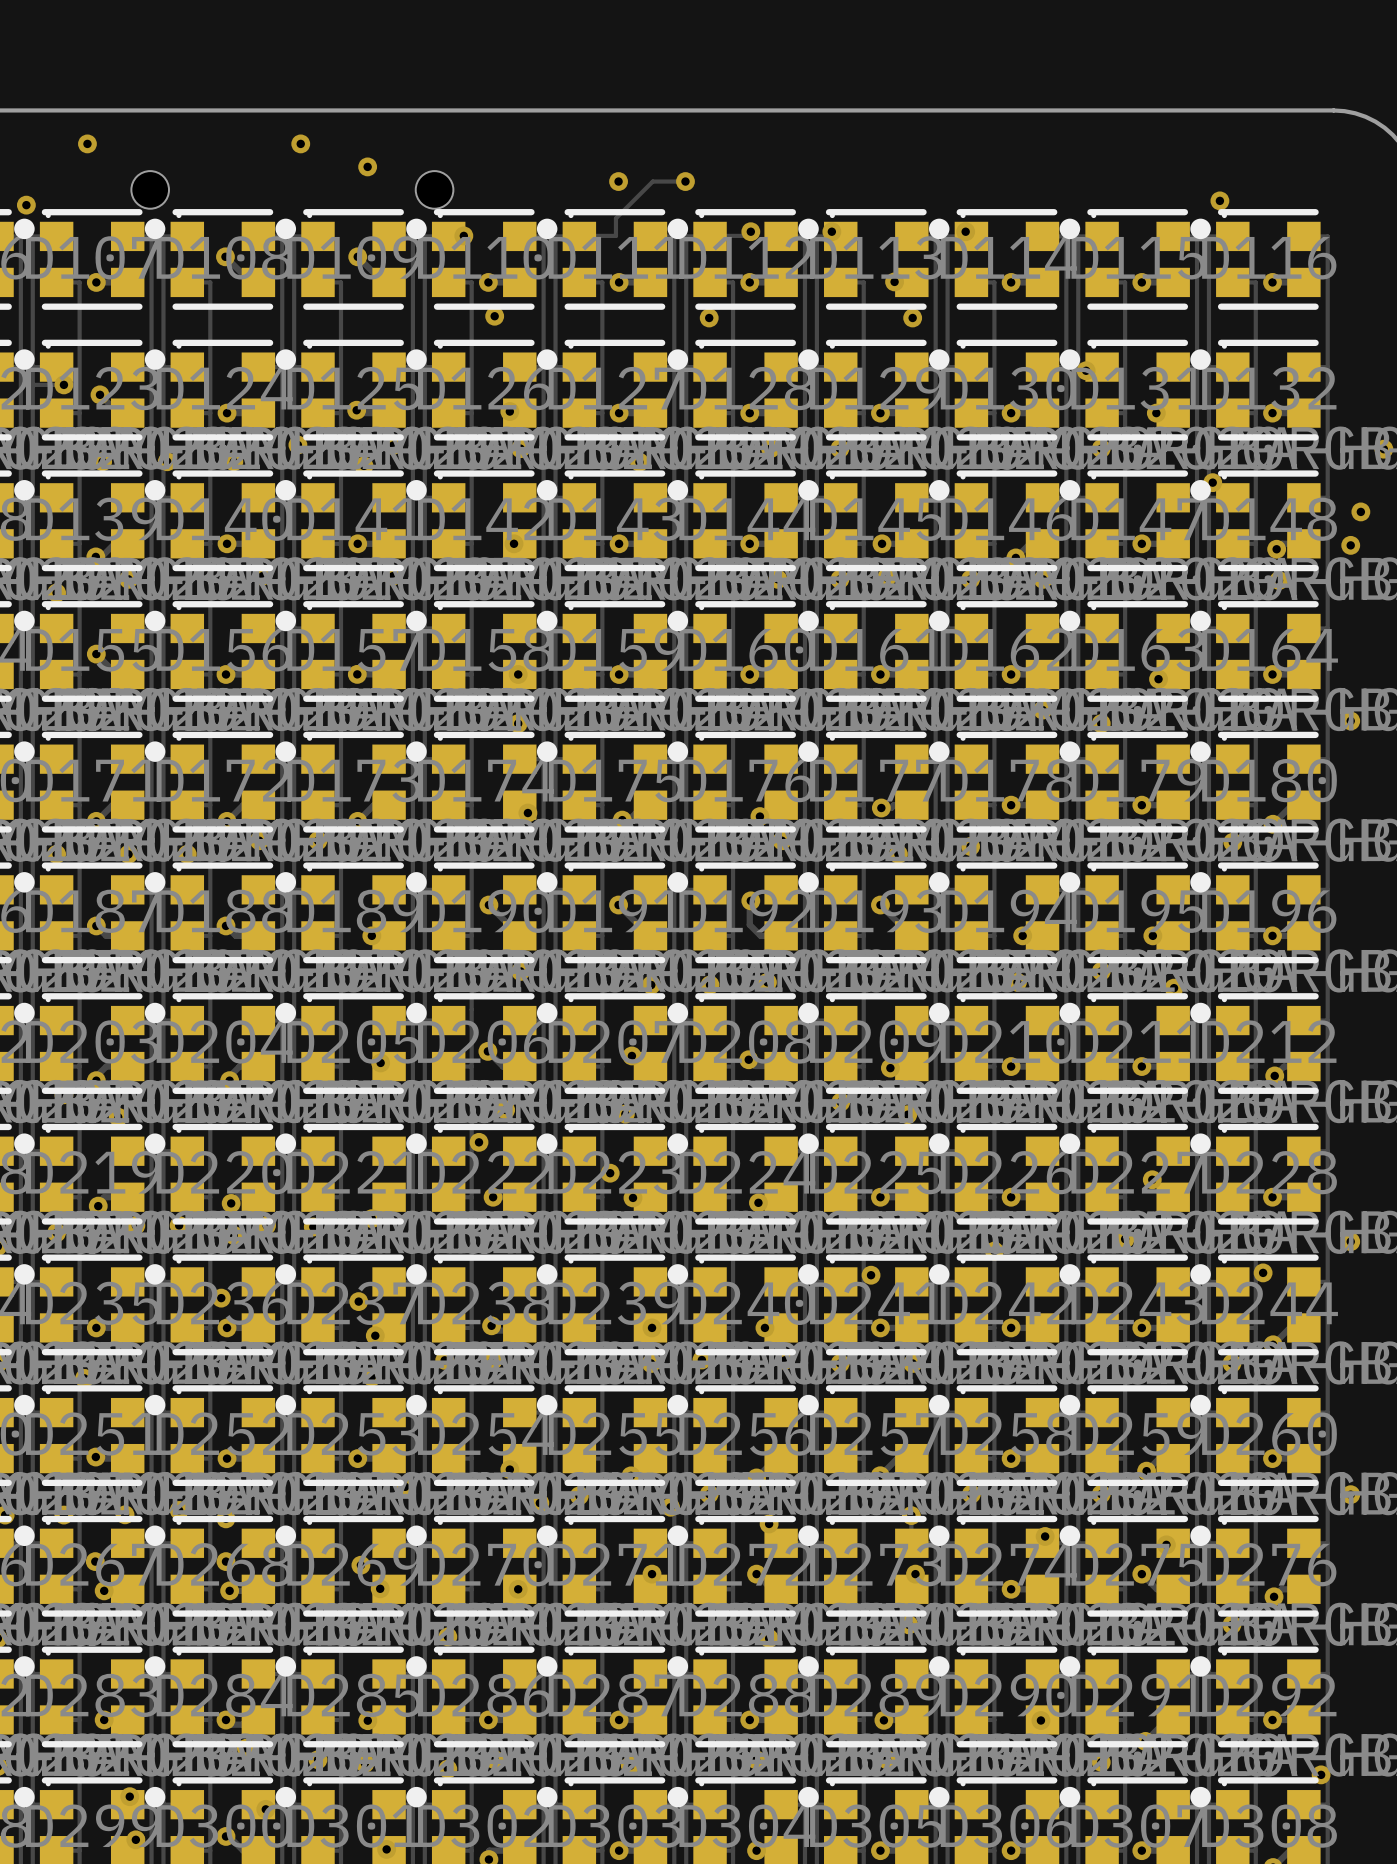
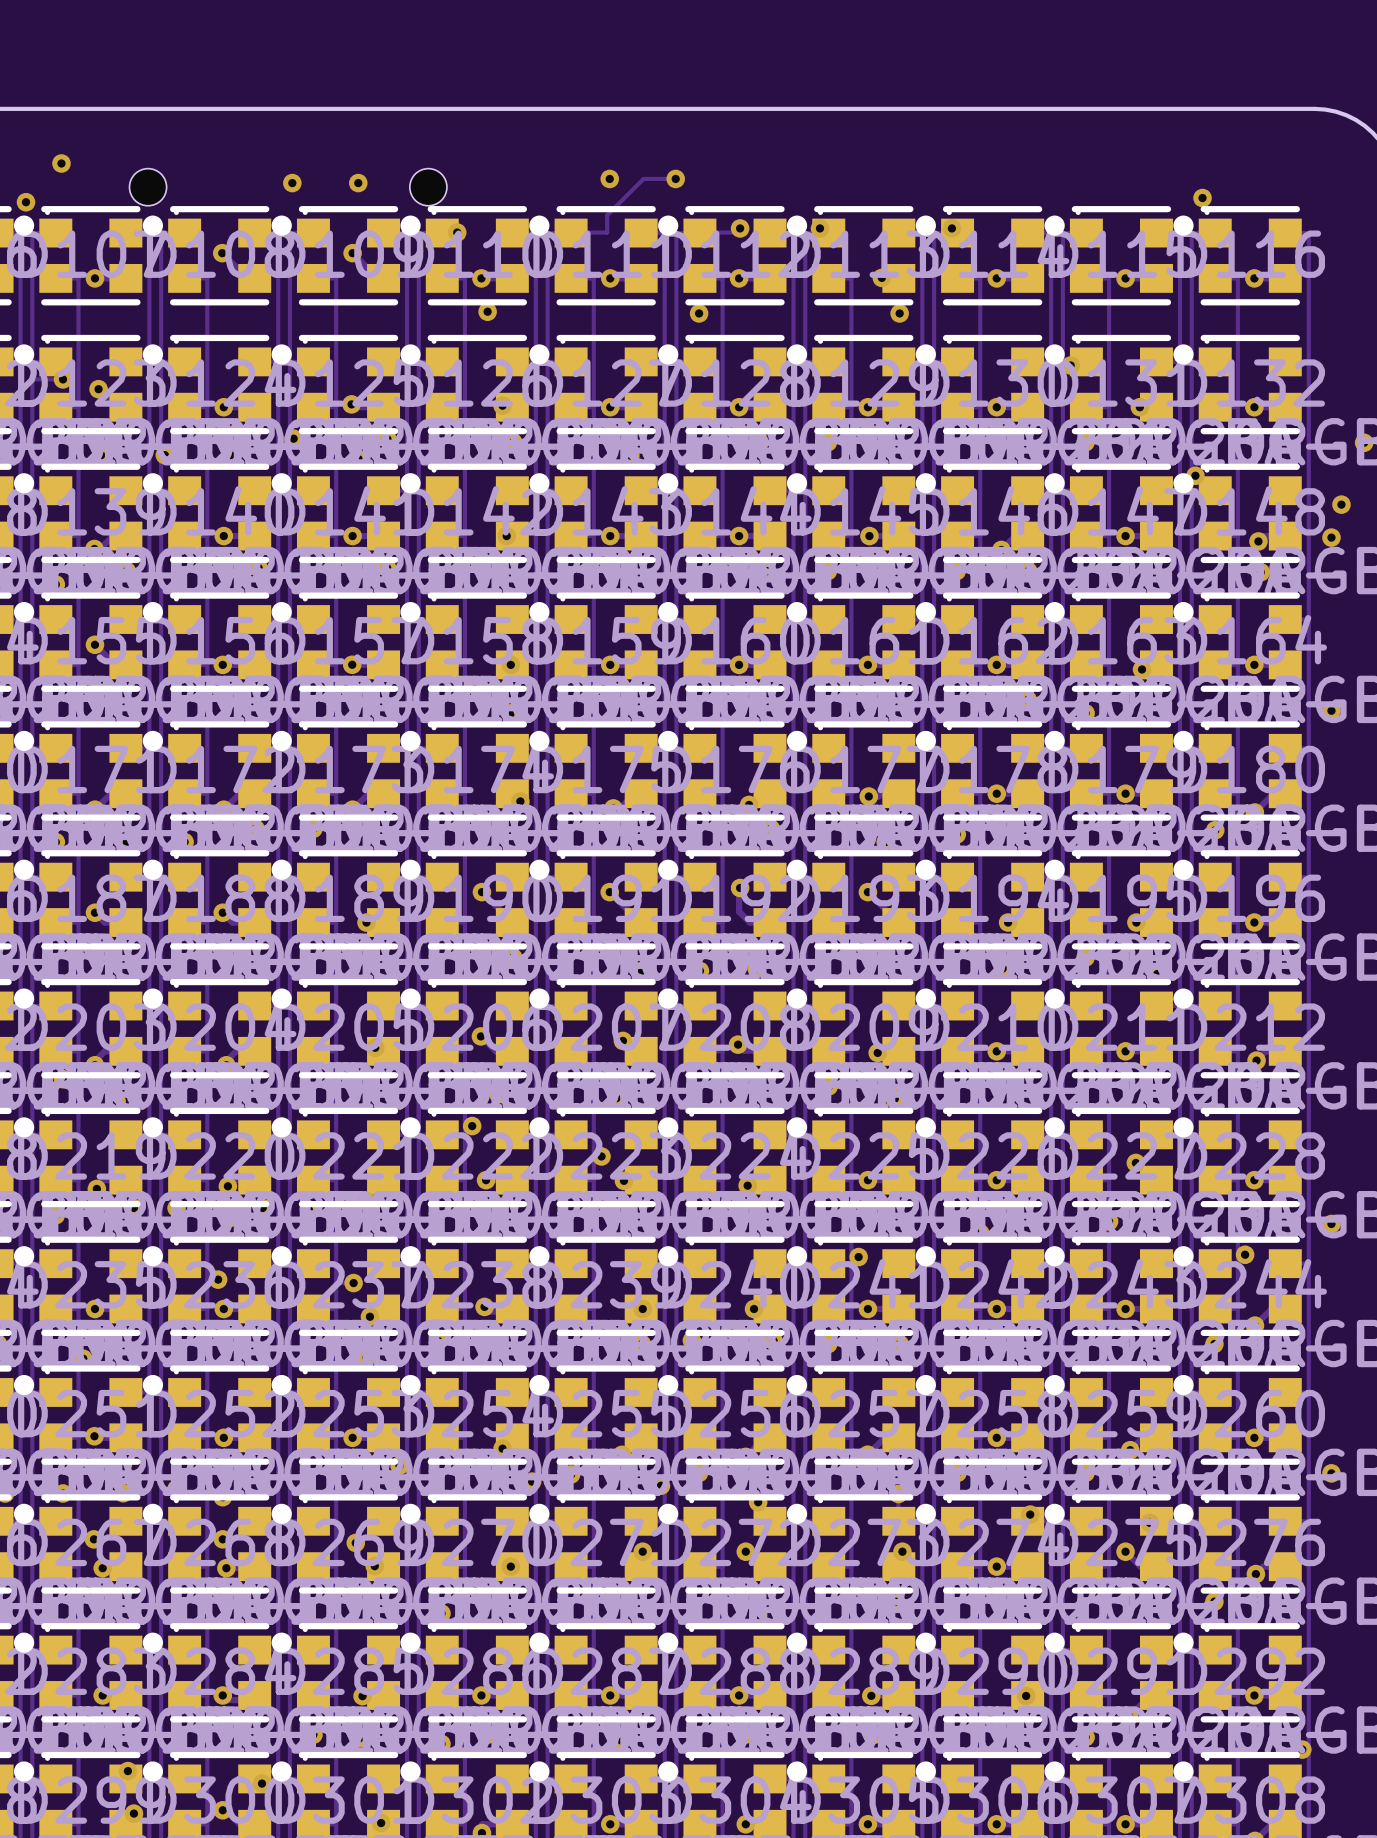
via position: (87, 143) -> (61, 163)
via: (300, 143) -> none
via position: (367, 166) -> (358, 183)
via: none -> (292, 183)

